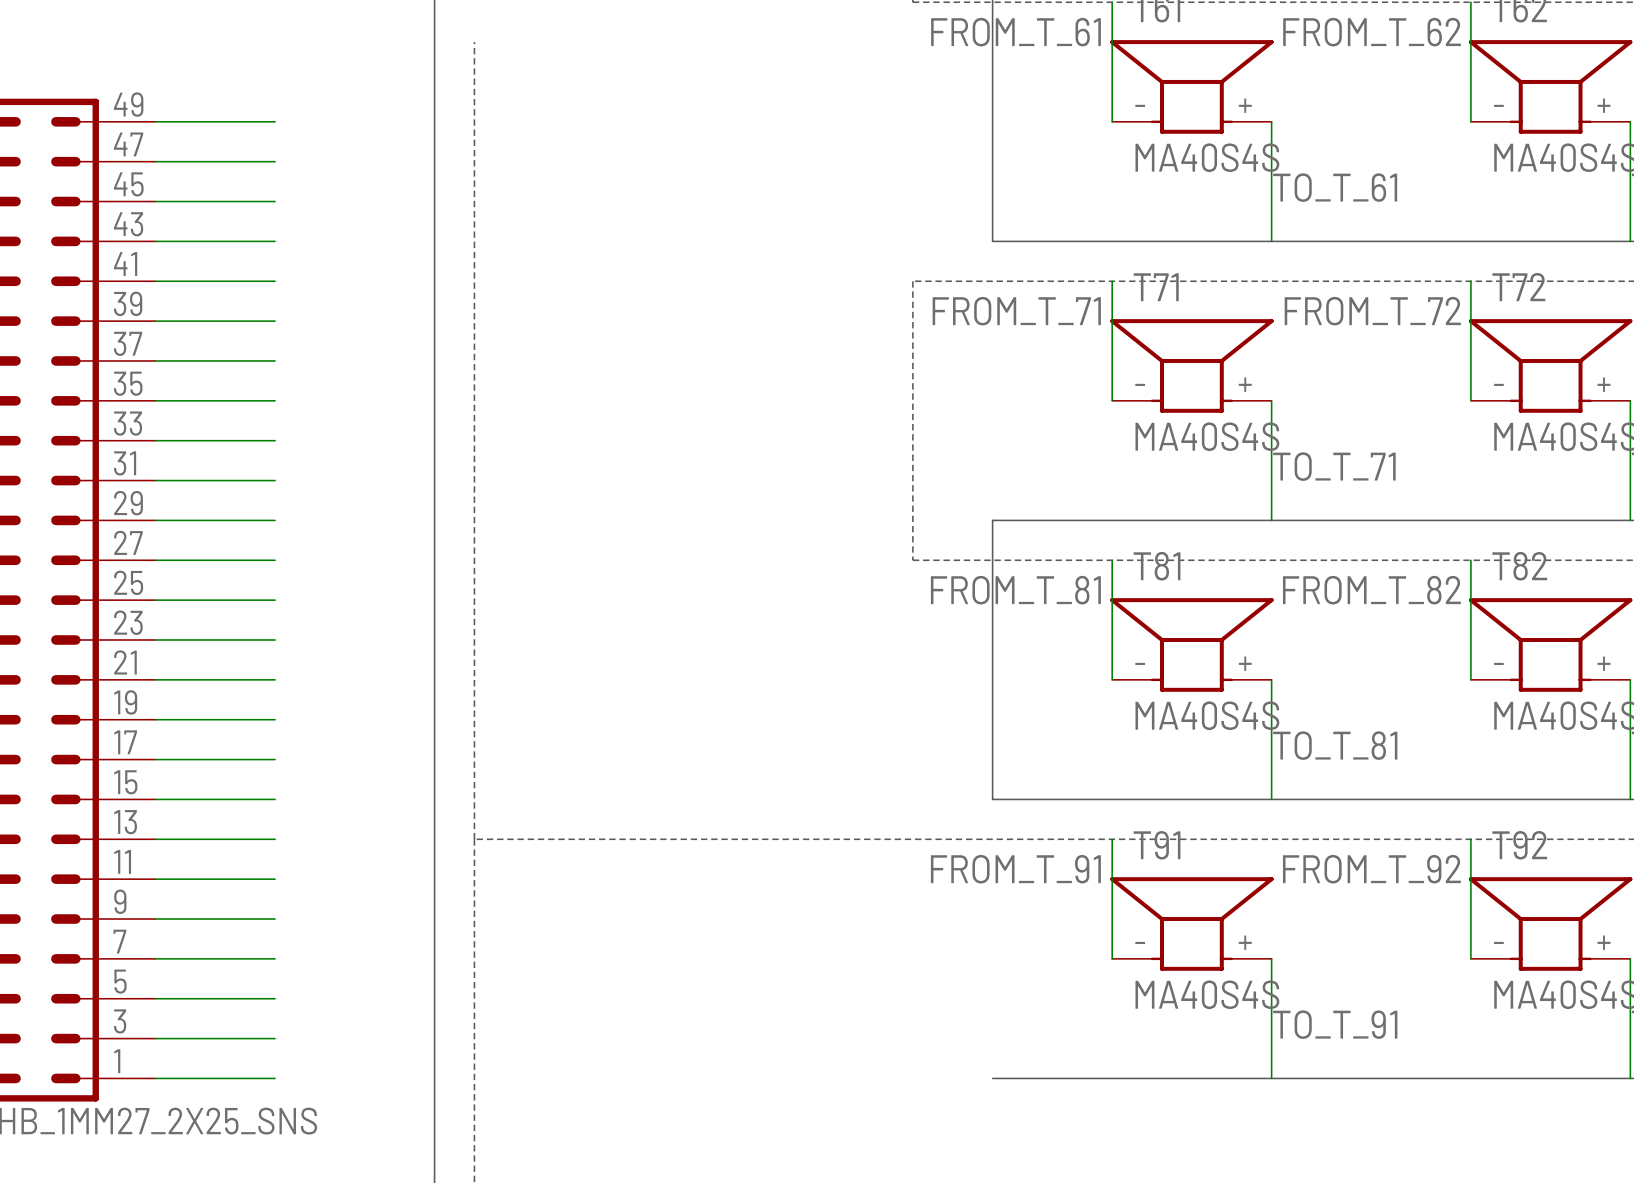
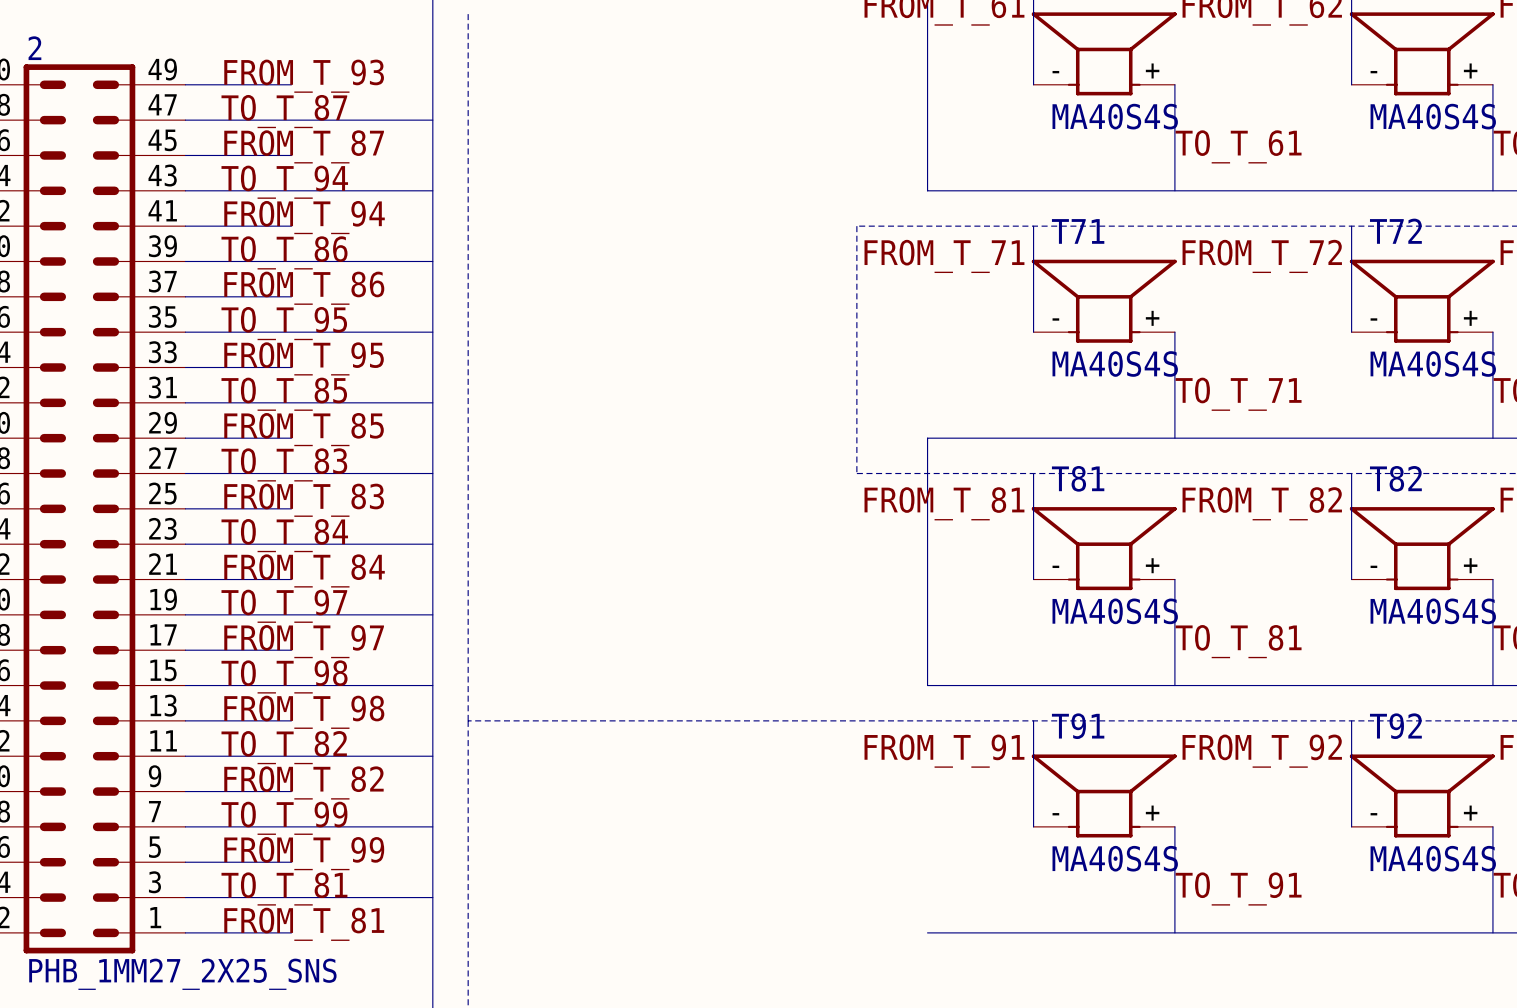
label: none -> FROM_T_93 (304, 76)
label: none -> TO_T_87 (284, 111)
wire: none -> (291, 120) (432, 120)
label: none -> FROM_T_87 (304, 146)
label: none -> TO_T_94 (284, 182)
wire: none -> (291, 190) (432, 190)
label: none -> FROM_T_94 (304, 217)
label: none -> TO_T_86 (284, 252)
wire: none -> (291, 261) (432, 261)
label: none -> FROM_T_86 (304, 288)
label: none -> TO_T_95 (284, 323)
wire: none -> (291, 332) (432, 332)
label: none -> FROM_T_95 (304, 358)
label: none -> TO_T_85 (284, 394)
wire: none -> (291, 402) (432, 402)
label: none -> FROM_T_85 (304, 429)
label: none -> TO_T_83 (284, 464)
wire: none -> (291, 473) (432, 473)
label: none -> FROM_T_83 (304, 500)
label: none -> TO_T_84 (284, 535)
wire: none -> (291, 544) (432, 544)
label: none -> FROM_T_84 (304, 570)
label: none -> TO_T_97 (284, 606)
wire: none -> (291, 614) (432, 614)
label: none -> FROM_T_97 (304, 641)
label: none -> TO_T_98 (284, 676)
wire: none -> (291, 685) (432, 685)
label: none -> FROM_T_98 (304, 712)
label: none -> TO_T_82 (284, 747)
wire: none -> (291, 756) (432, 756)
label: none -> FROM_T_82 (303, 782)
label: none -> TO_T_99 (284, 818)
wire: none -> (291, 826) (432, 826)
label: none -> FROM_T_99 (304, 853)
label: none -> TO_T_81 (284, 888)
wire: none -> (291, 897) (432, 897)
label: none -> FROM_T_81 (304, 924)

